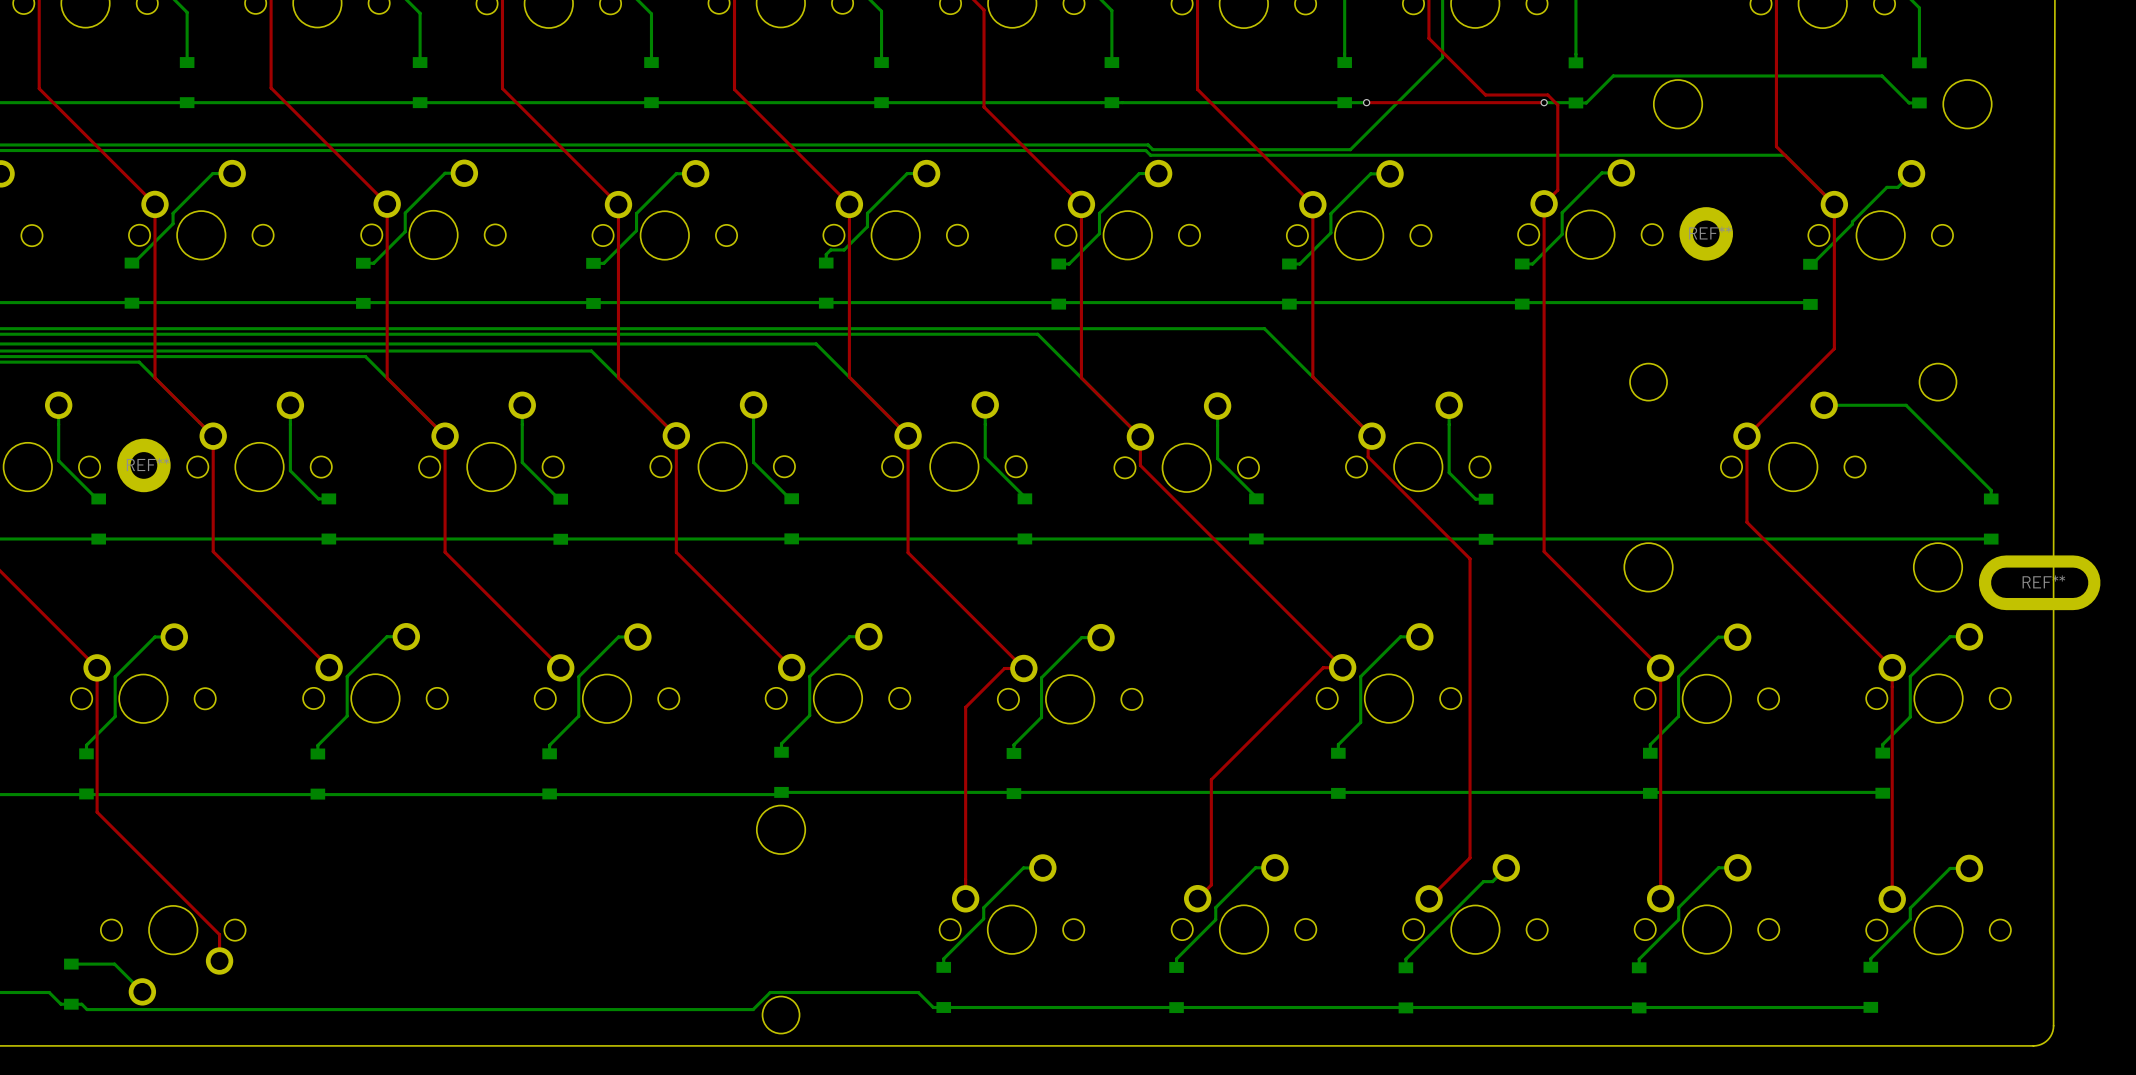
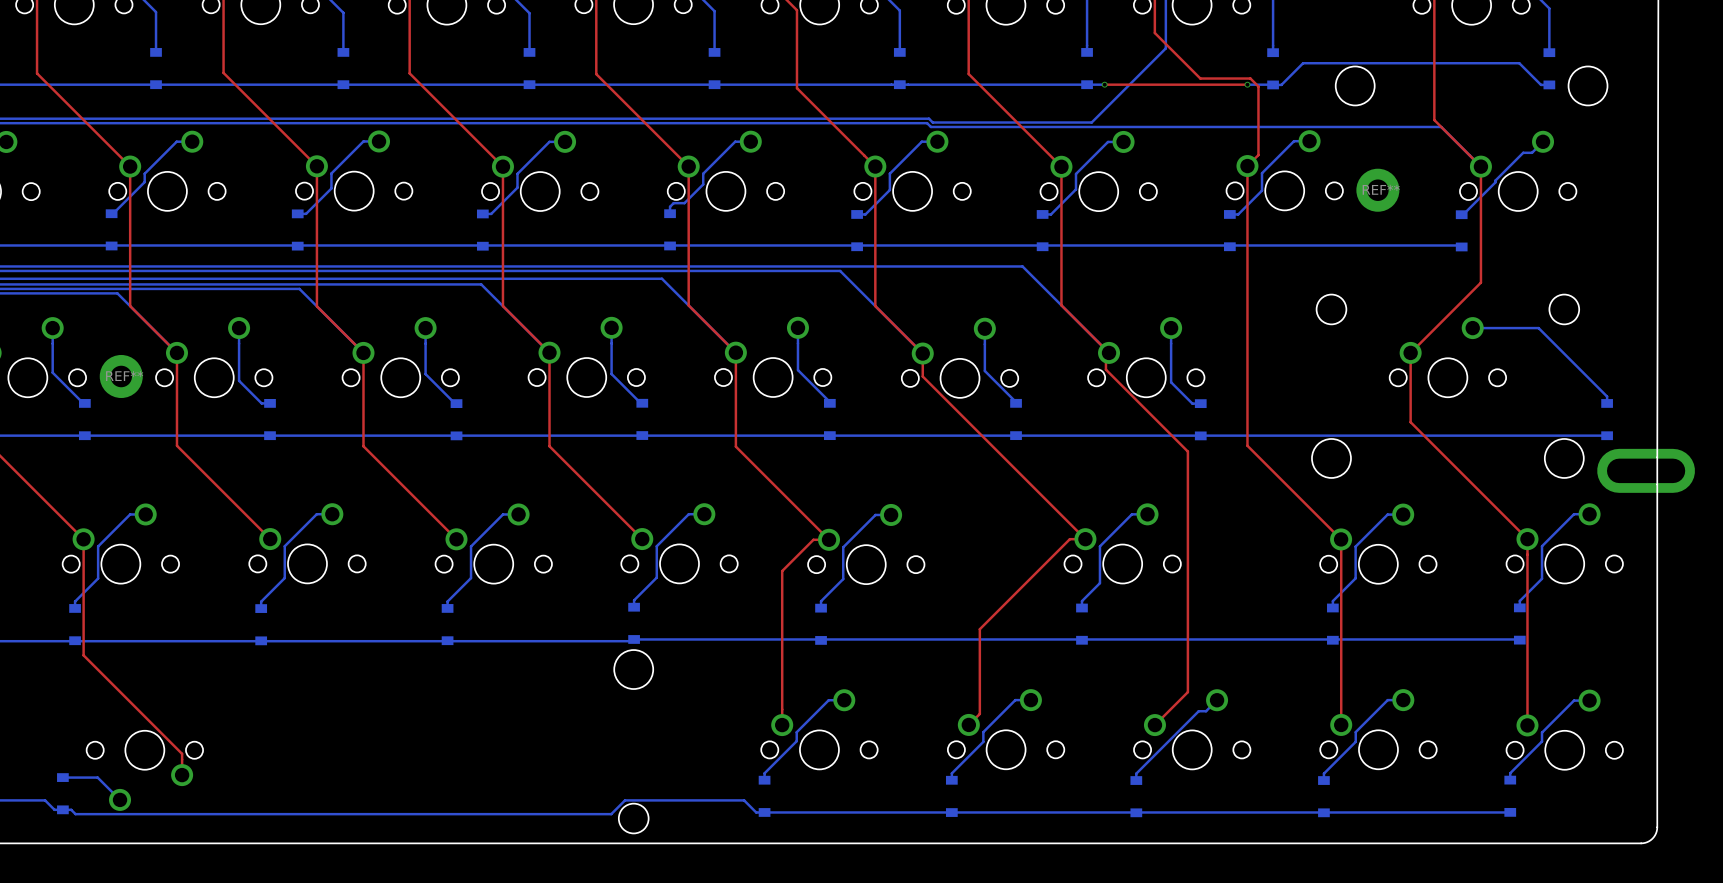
REF** name: REF** (2043, 581) -> none

